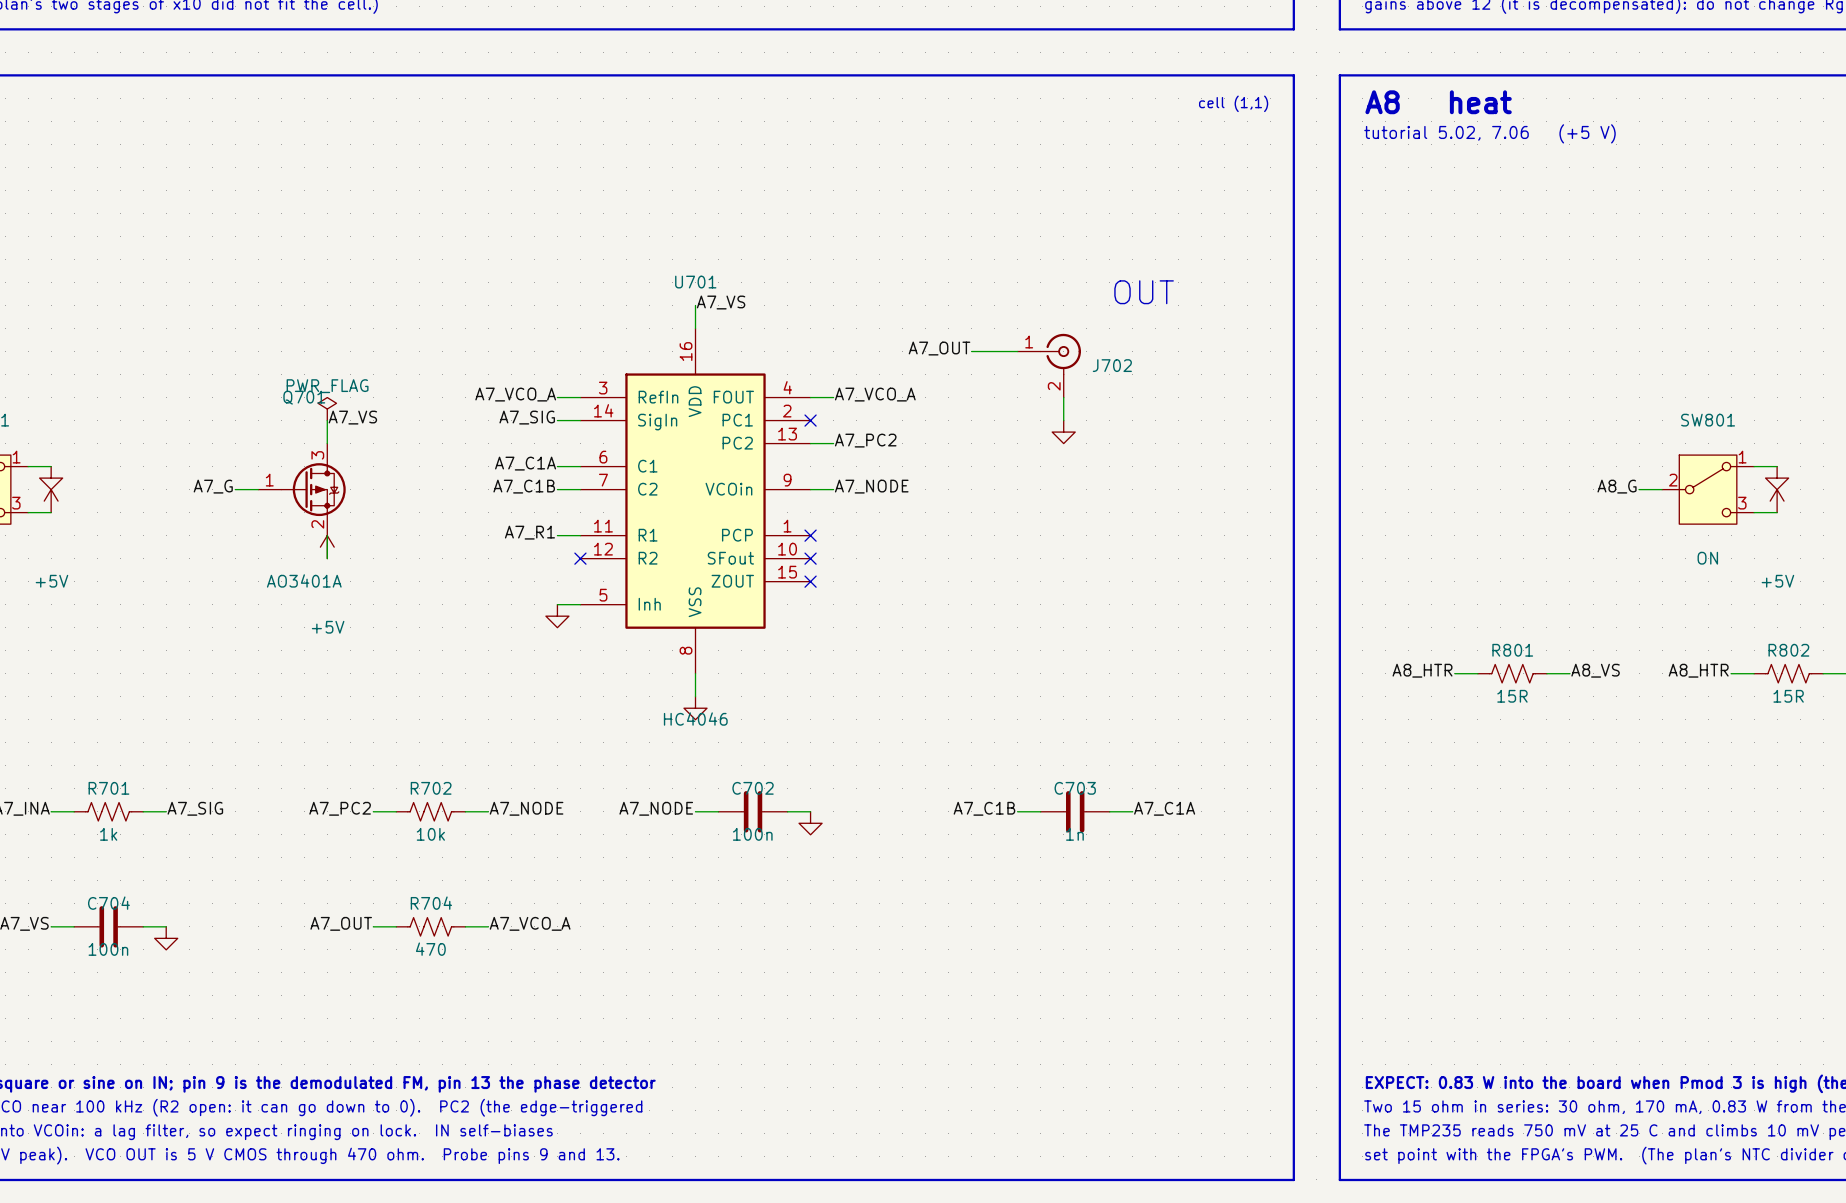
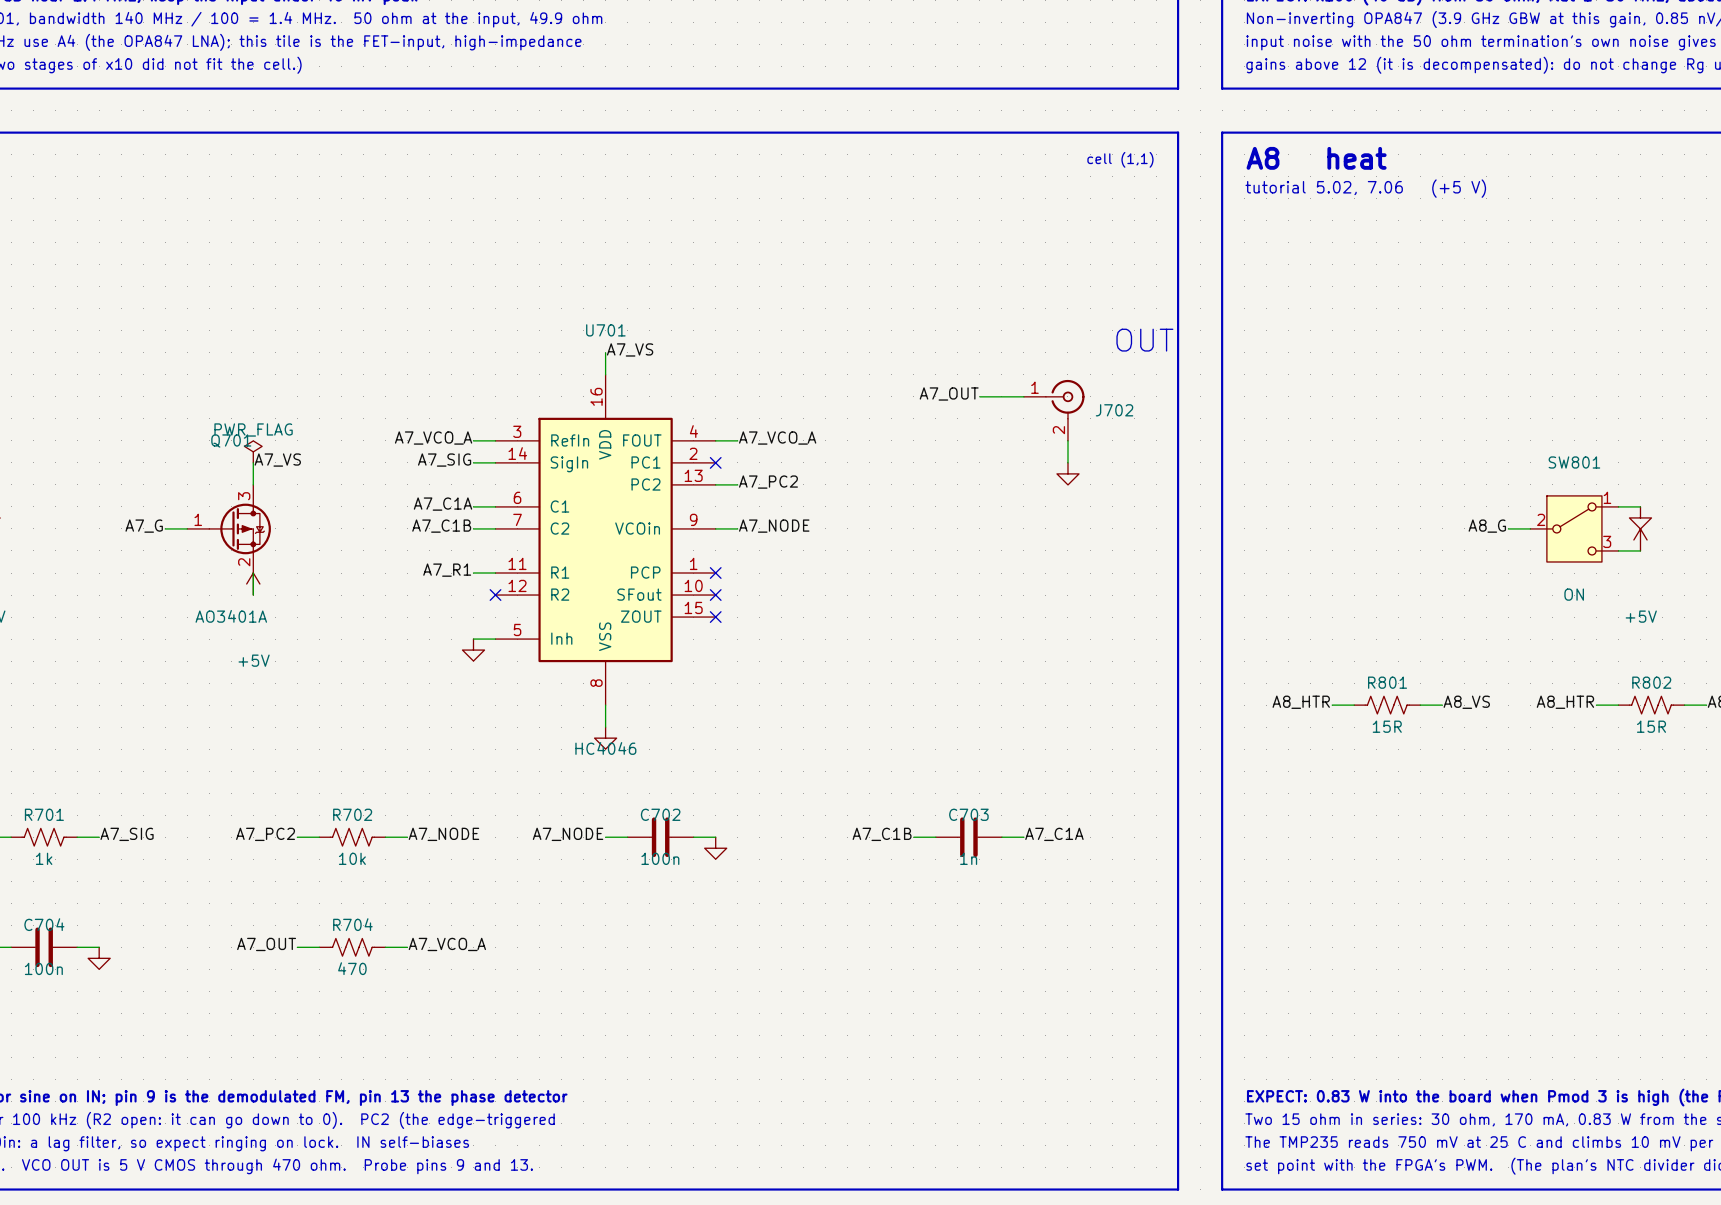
text position: OUT (1144, 292) -> OUT (1144, 340)
label position: A7_OUT (939, 348) -> A7_OUT (949, 393)
wire: (971, 351) (1017, 351) -> (979, 396) (1023, 396)
J702 position: (1049, 365) -> (1054, 410)
wire: (1063, 397) (1063, 420) -> (1067, 440) (1067, 462)
power symbol position: (1063, 432) -> (1067, 473)

